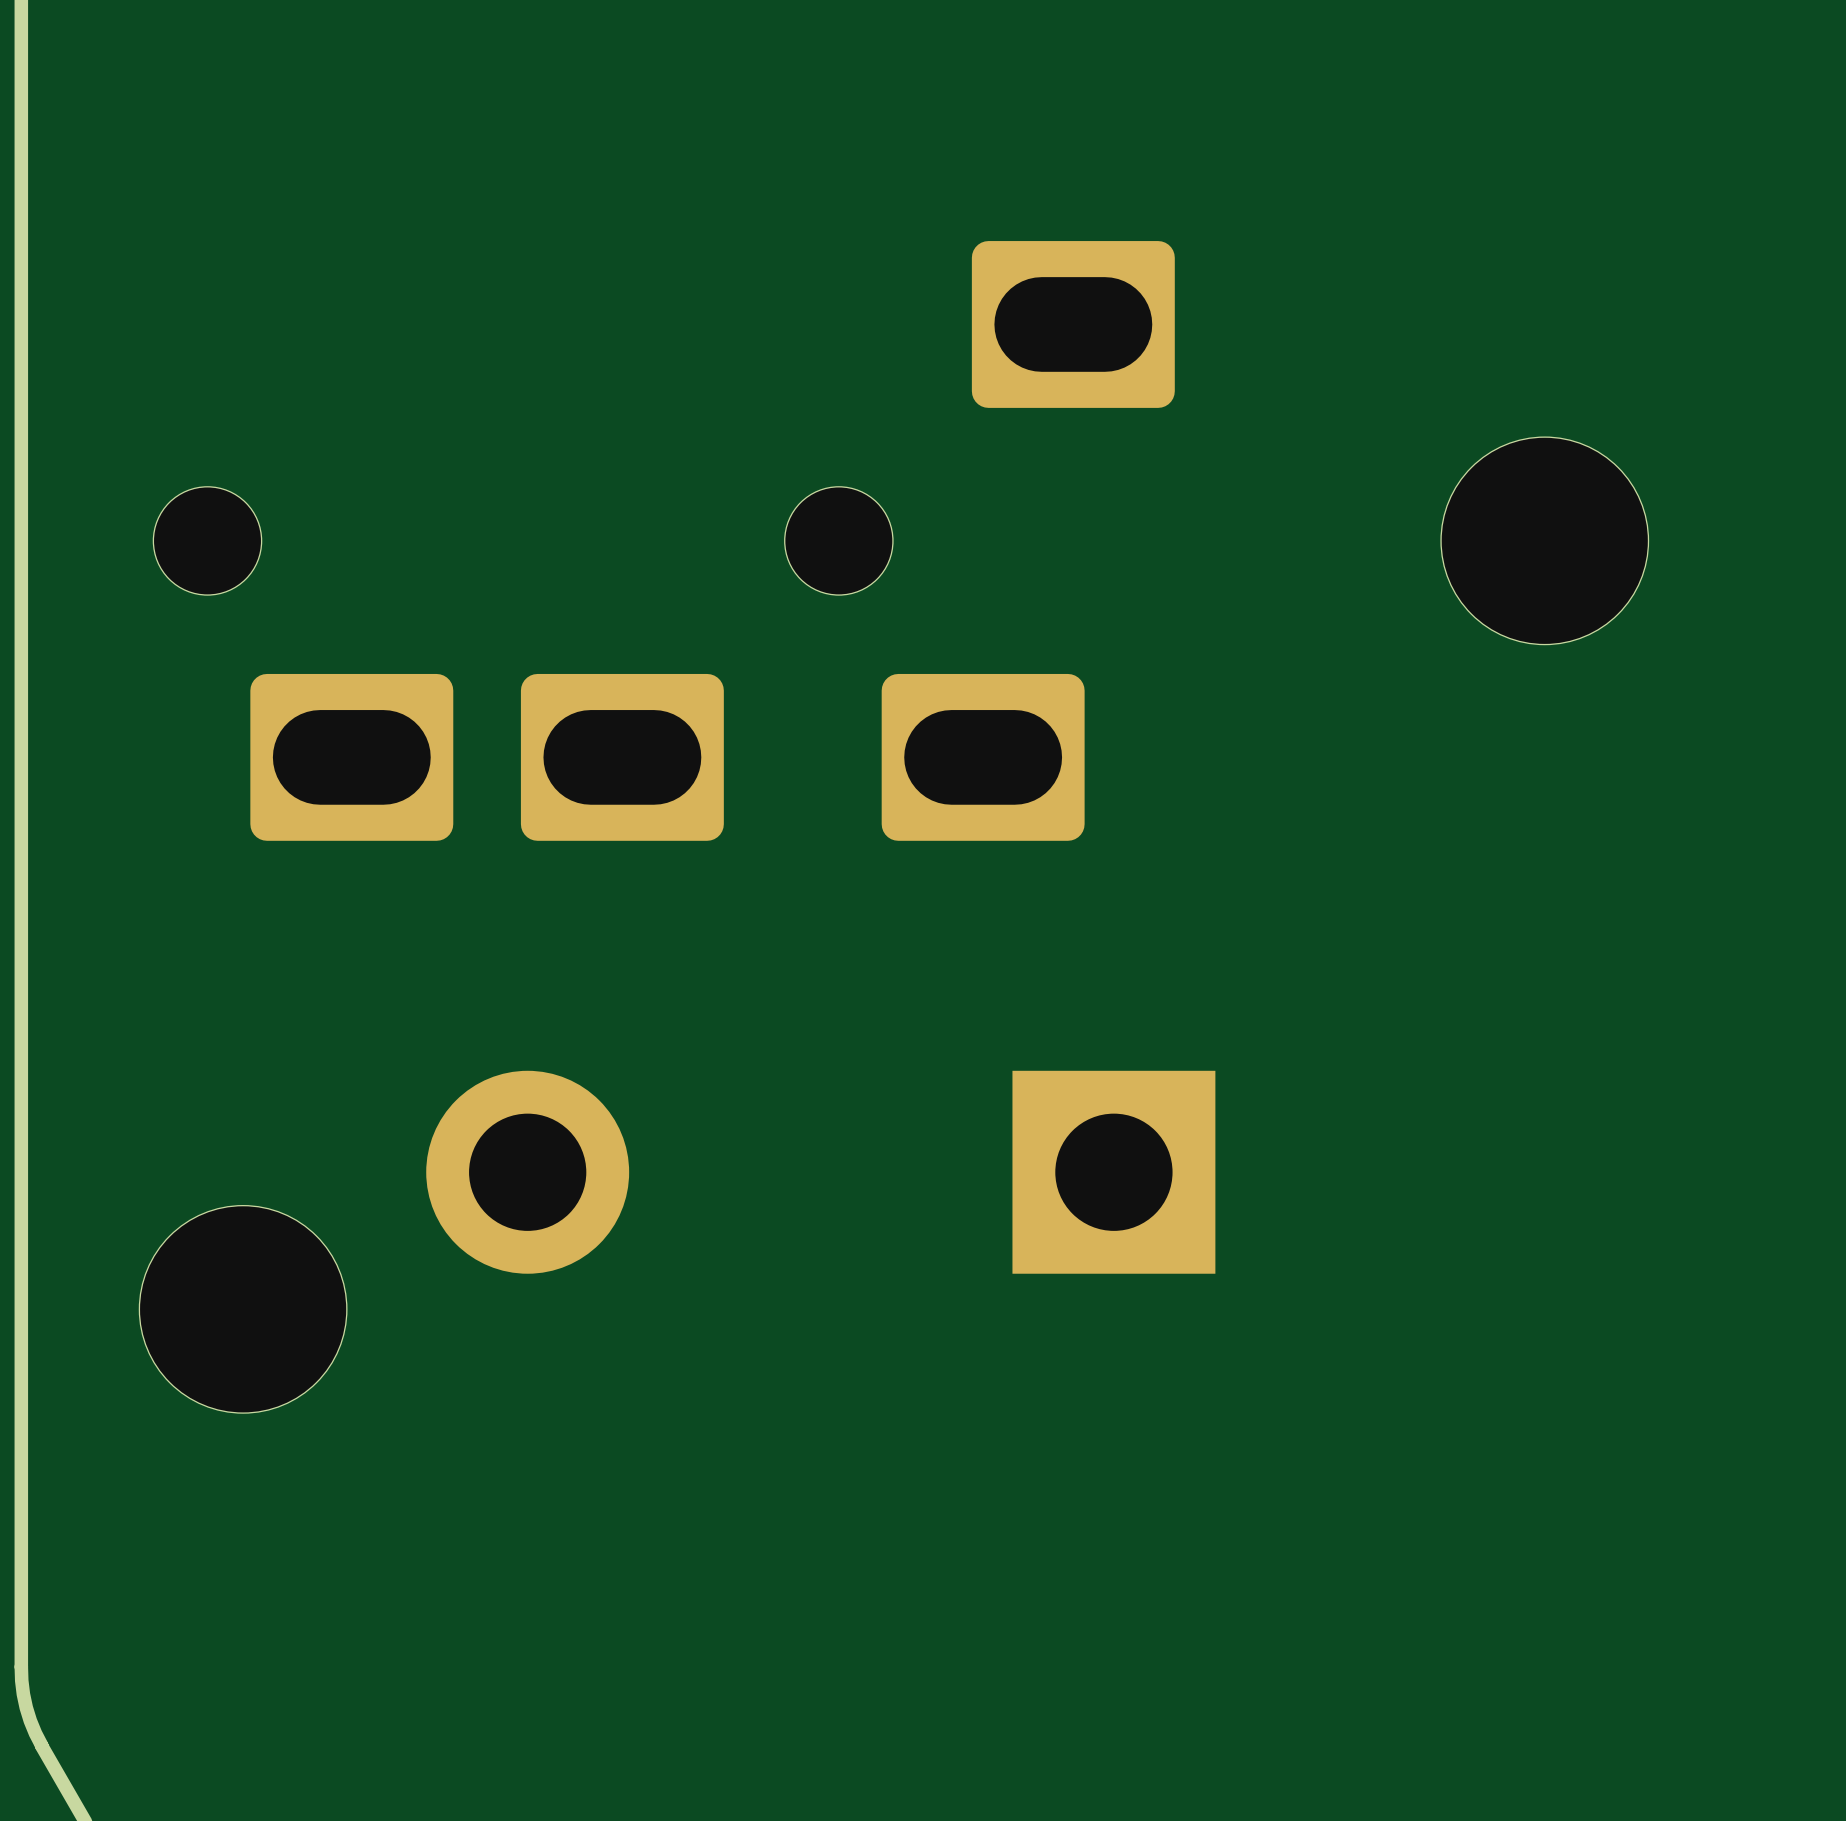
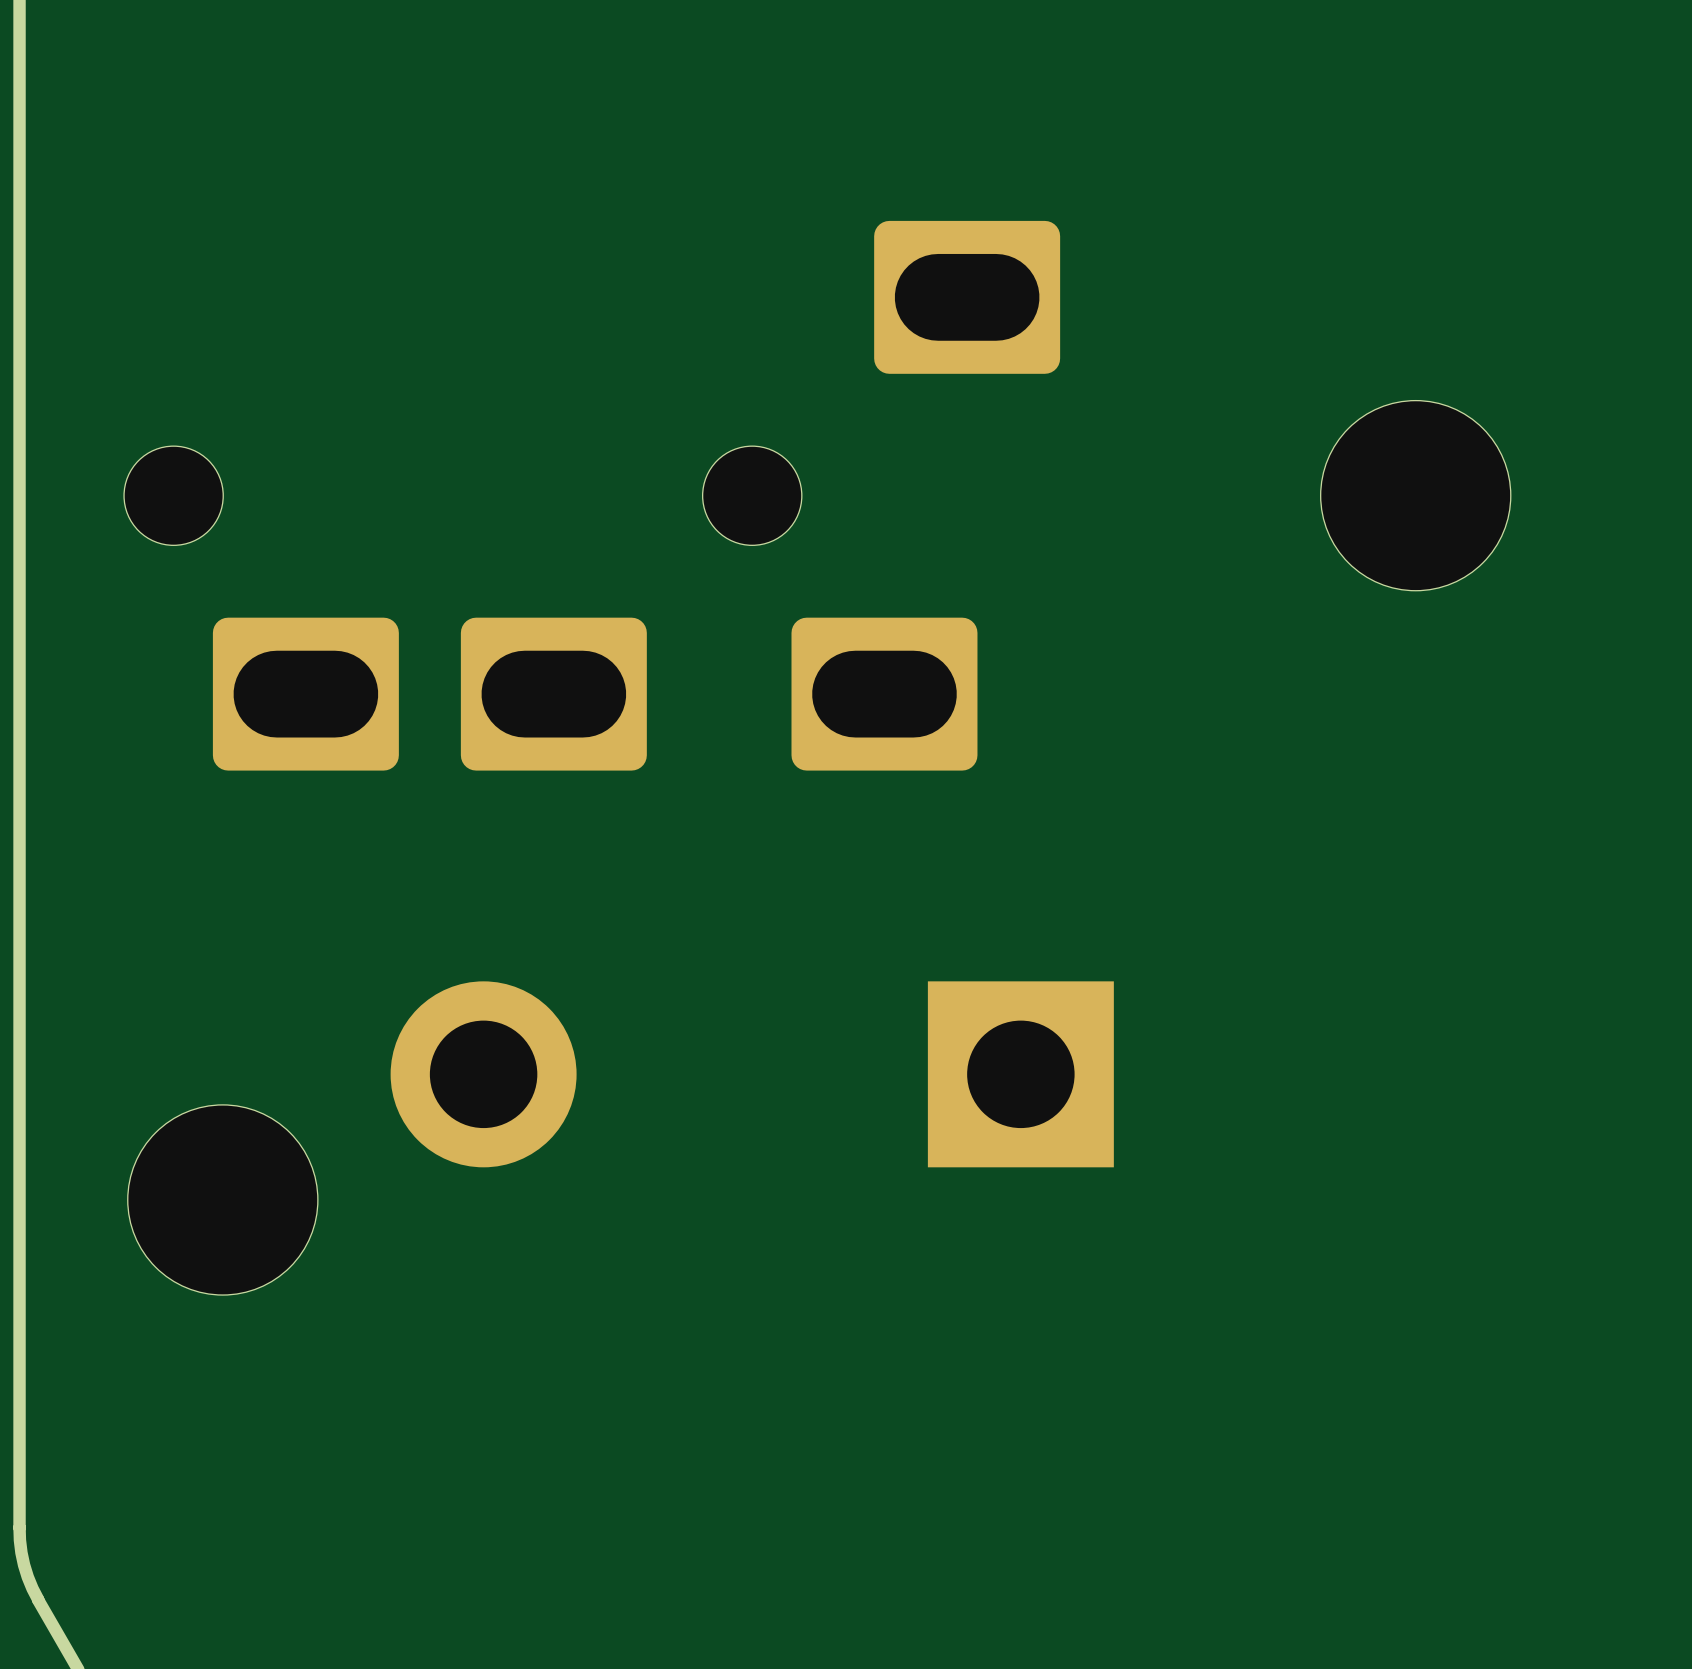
part position: (664, 540) -> (592, 495)

